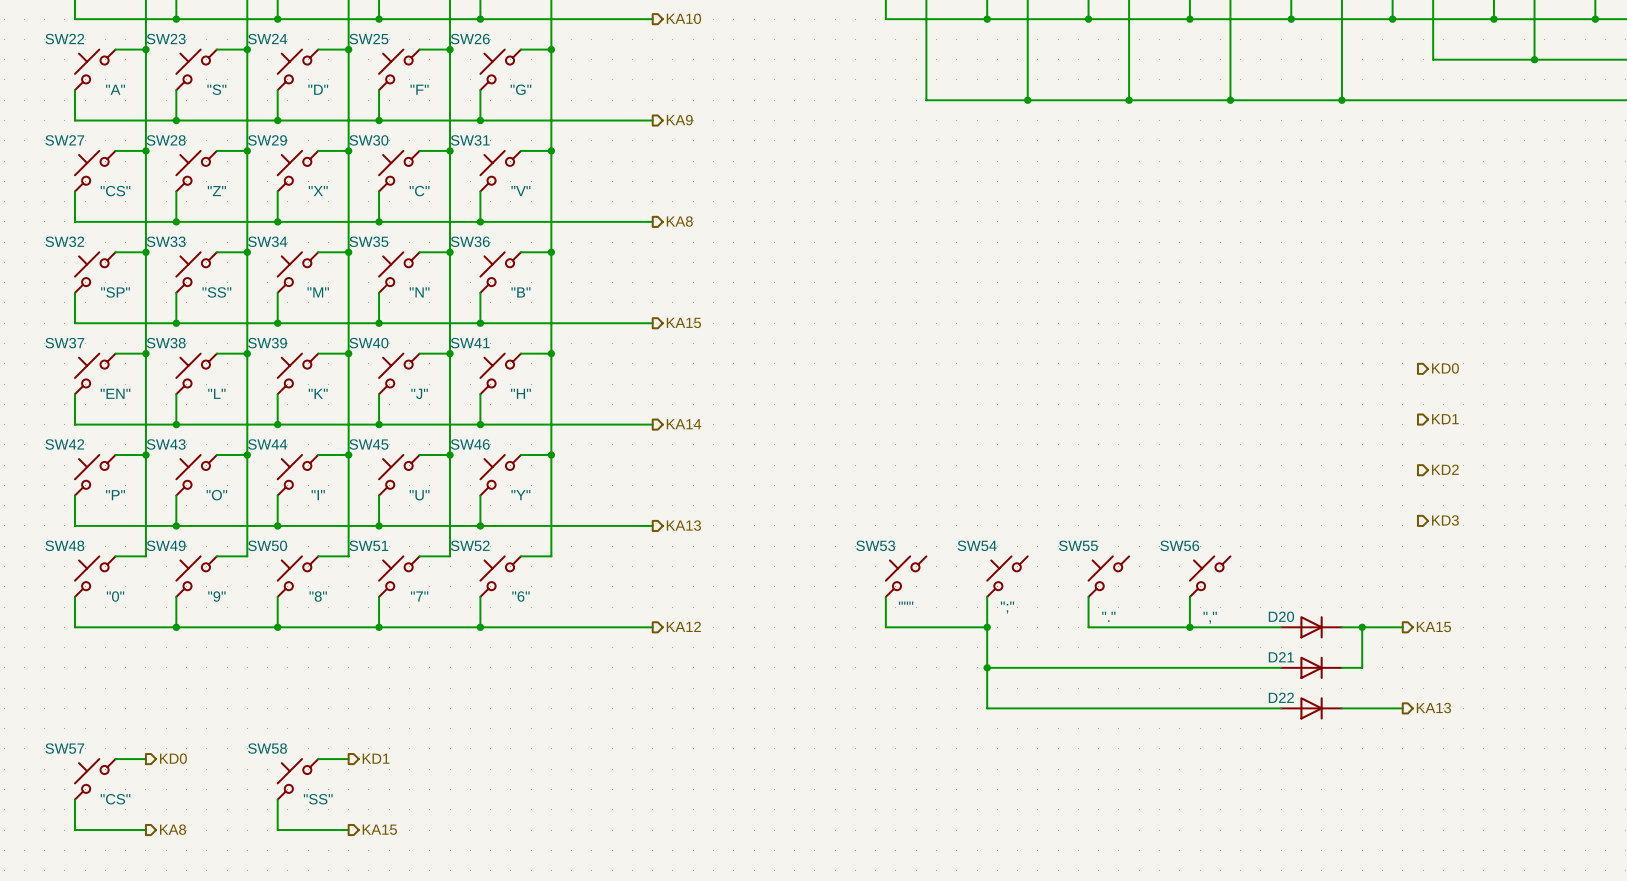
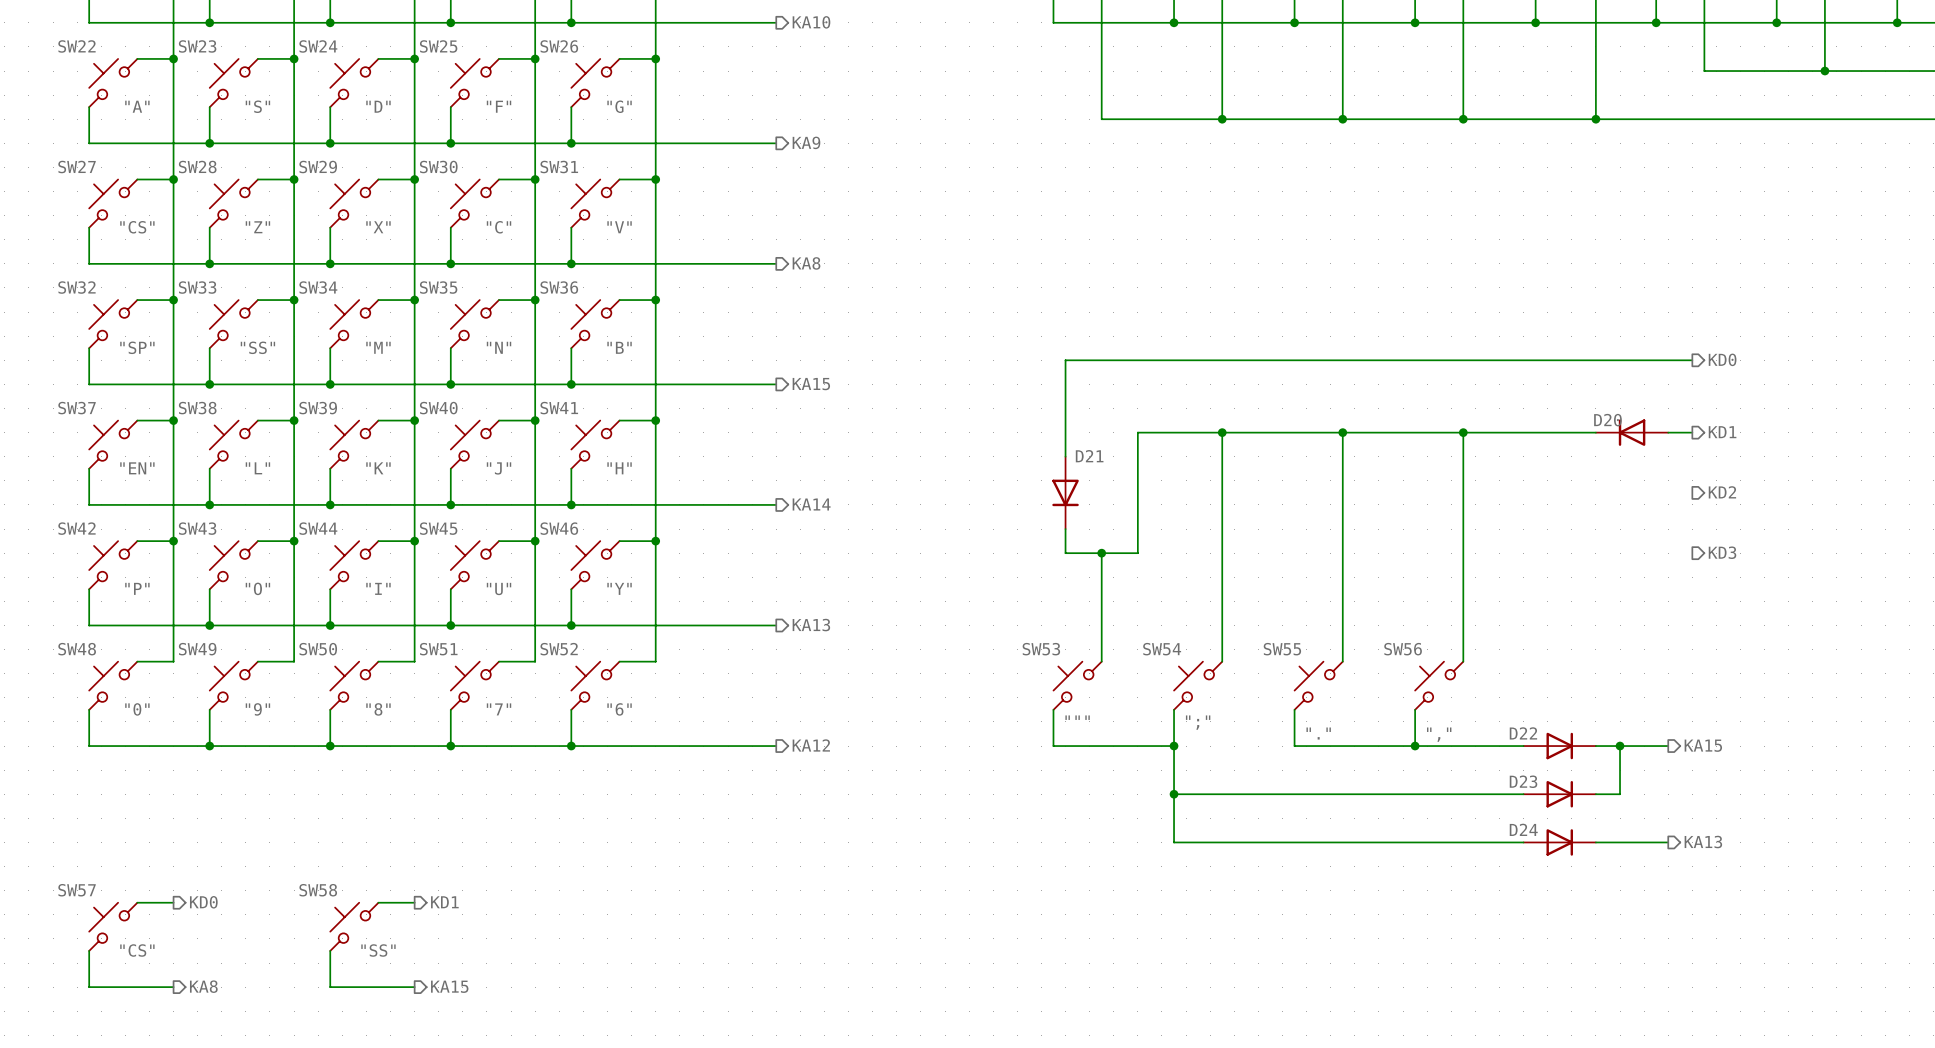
wire: none -> (1692, 360) (1065, 360) (1065, 456)
wire: none -> (1222, 432) (1222, 661)
junction: none -> (1222, 432)
wire: none -> (1342, 432) (1342, 661)
junction: none -> (1342, 432)
wire: none -> (1463, 432) (1463, 661)
junction: none -> (1463, 432)
wire: none -> (1595, 432) (1137, 432) (1137, 553) (1065, 553) (1065, 529)
D20: none -> (1632, 432)
wire: none -> (1668, 432) (1692, 432)
hierarchical label position: KD0 (1445, 368) -> KD0 (1722, 359)
D21: none -> (1065, 492)
hierarchical label position: KD1 (1445, 419) -> KD1 (1722, 432)
wire: none -> (1101, 553) (1101, 661)
junction: none -> (1101, 553)
hierarchical label position: KD2 (1445, 469) -> KD2 (1722, 492)
hierarchical label position: KD3 (1445, 520) -> KD3 (1722, 552)
D20 name: D20 (1281, 616) -> D22 (1523, 733)
D21 name: D21 (1281, 657) -> D23 (1523, 781)
D22 name: D22 (1281, 697) -> D24 (1523, 829)

